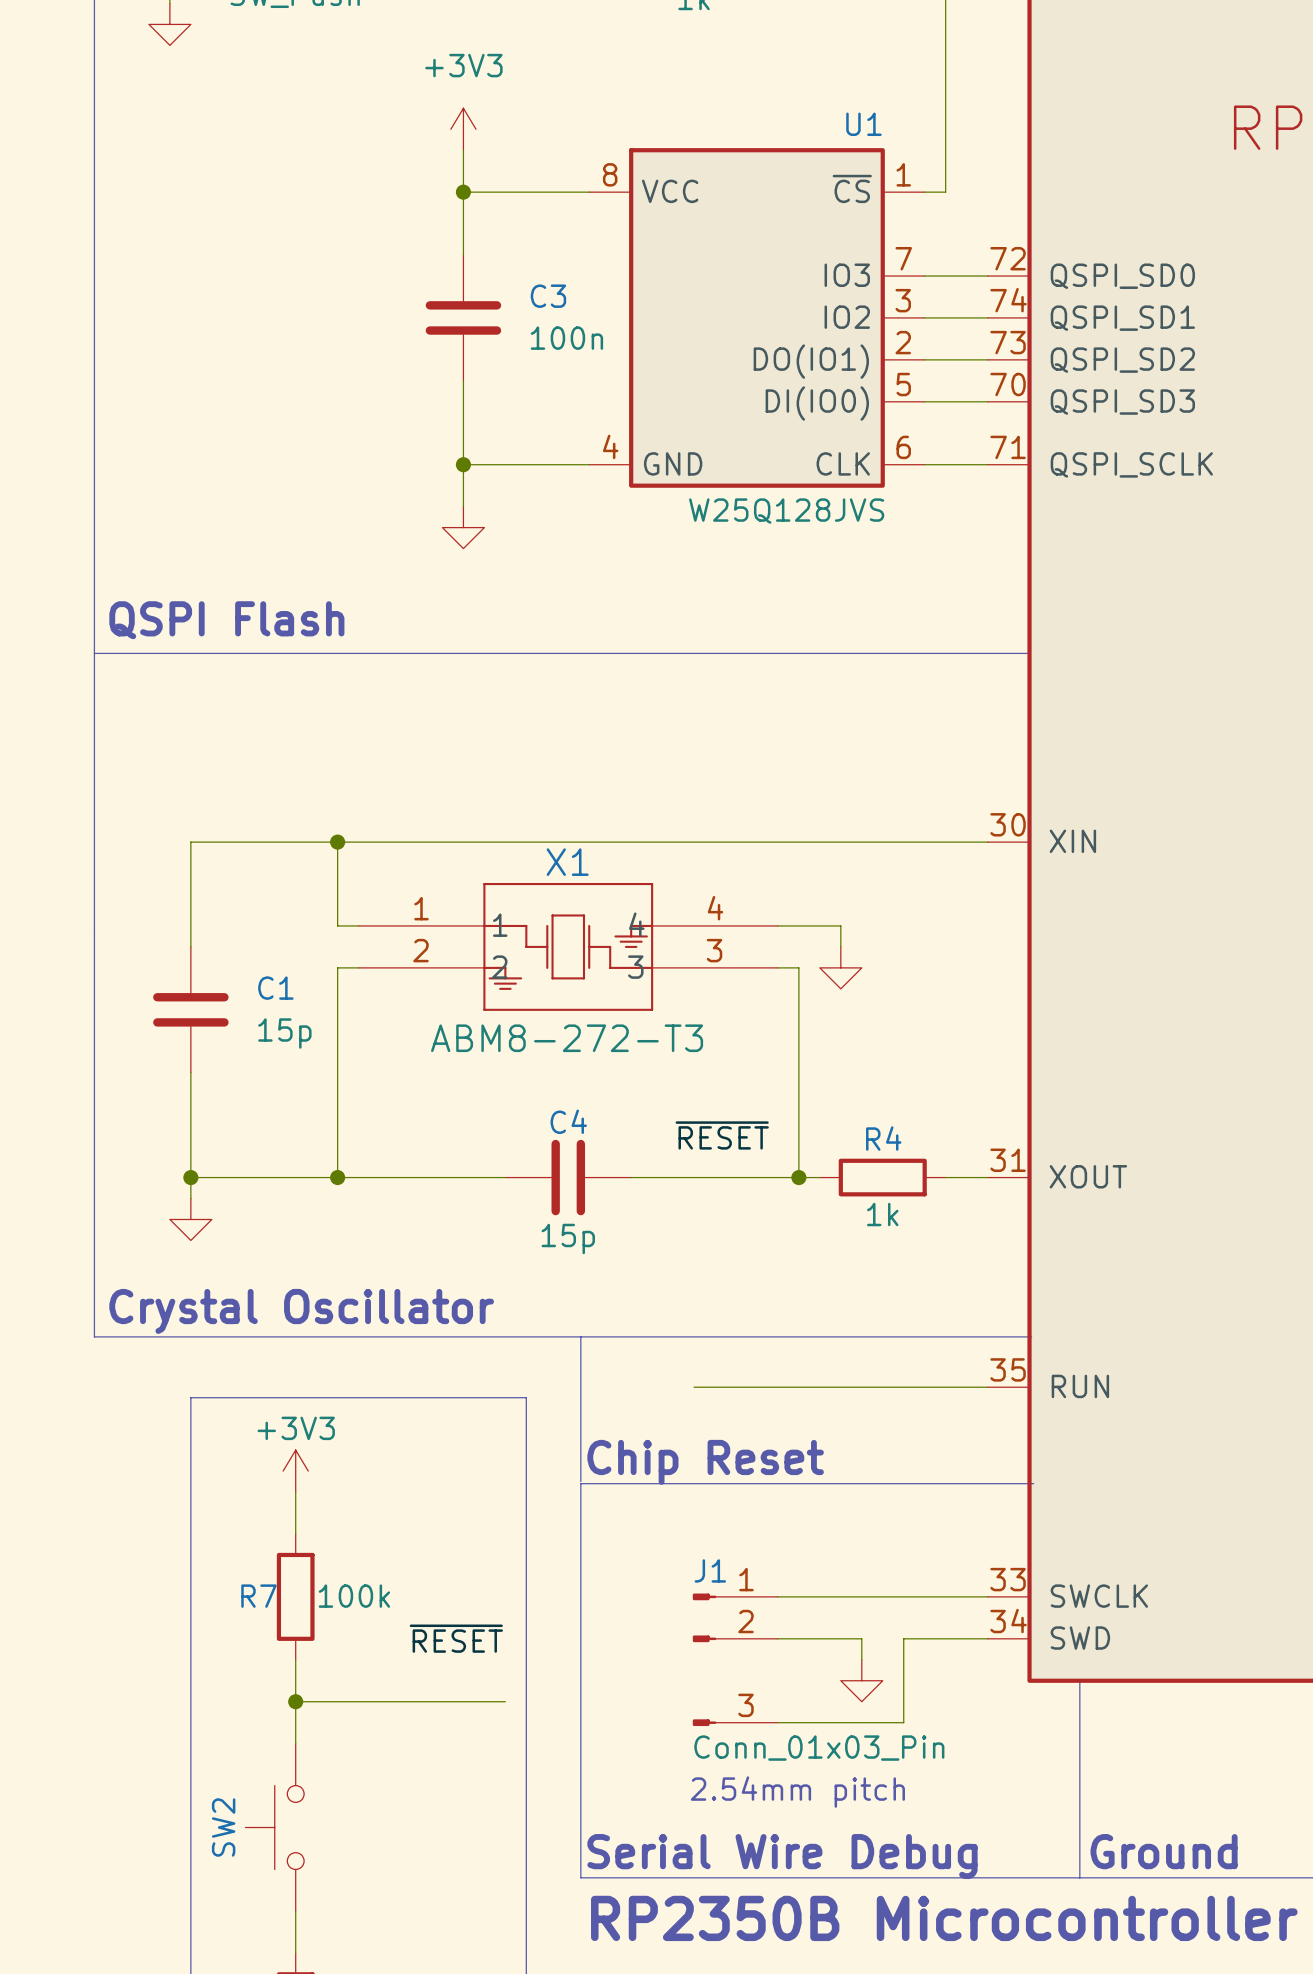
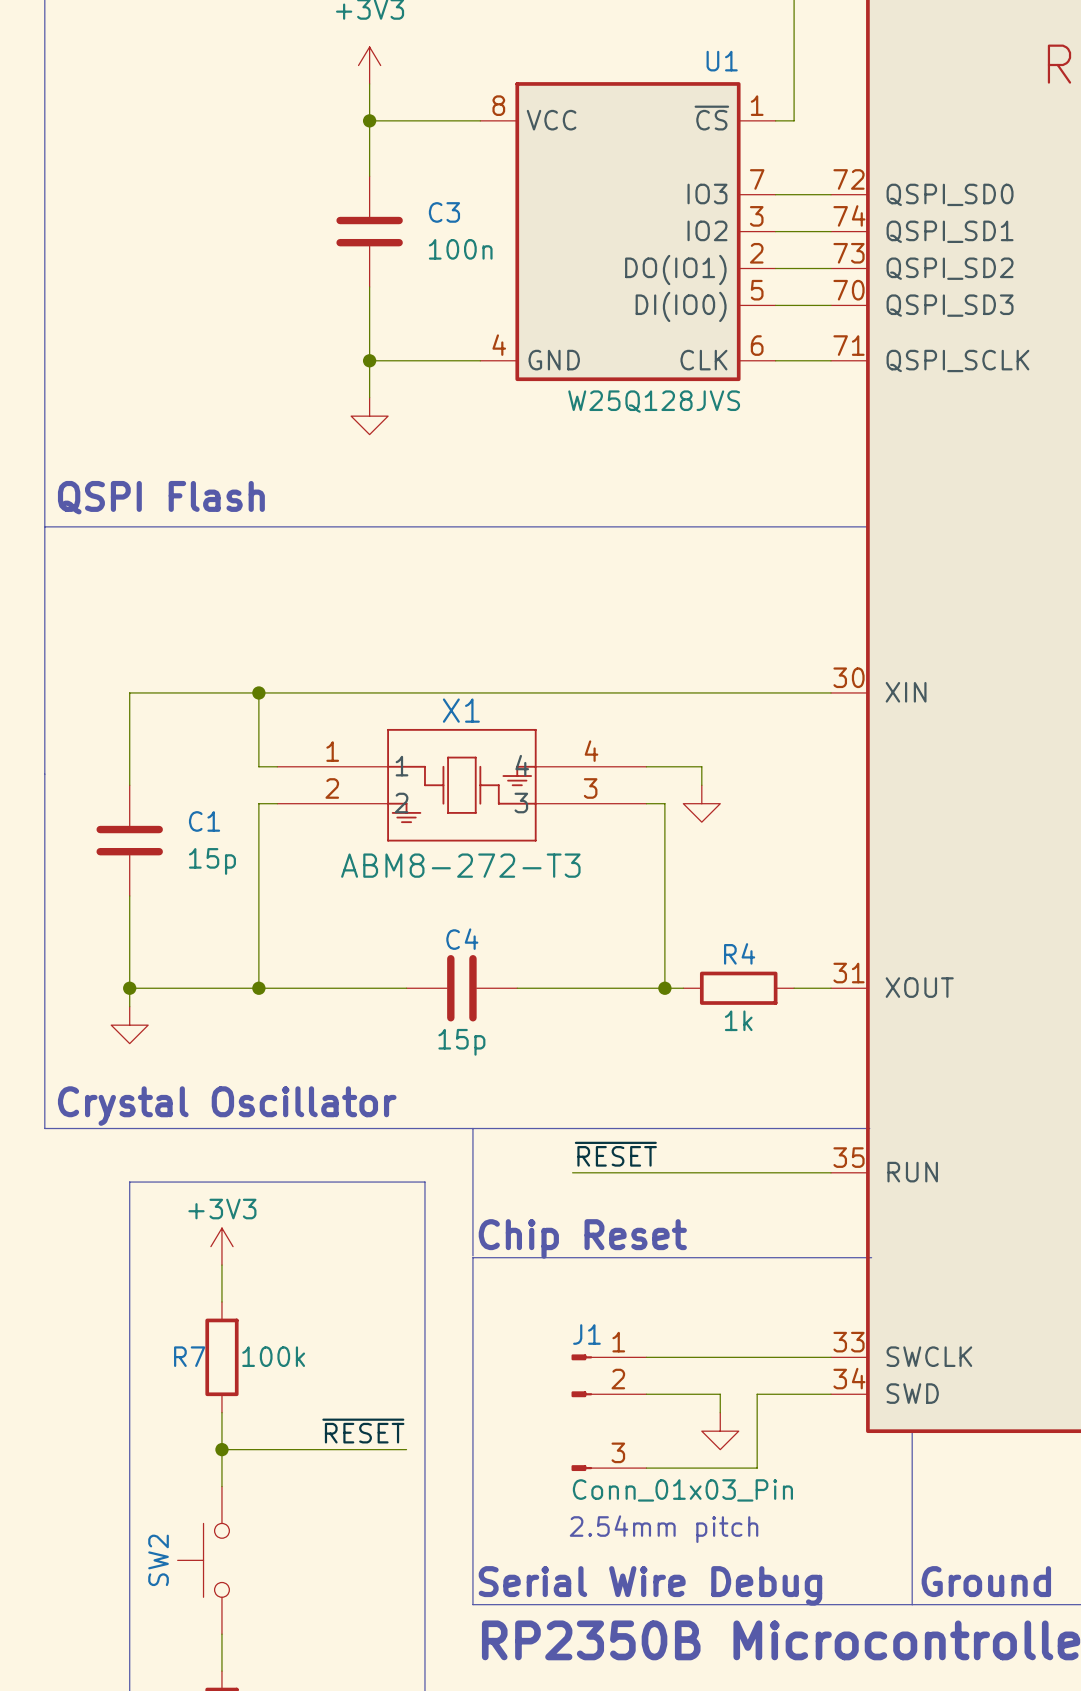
label: ~{RESET} (722, 1135) -> none
label: none -> ~{RESET} (615, 1154)
label position: ~{RESET} (456, 1638) -> ~{RESET} (363, 1431)

